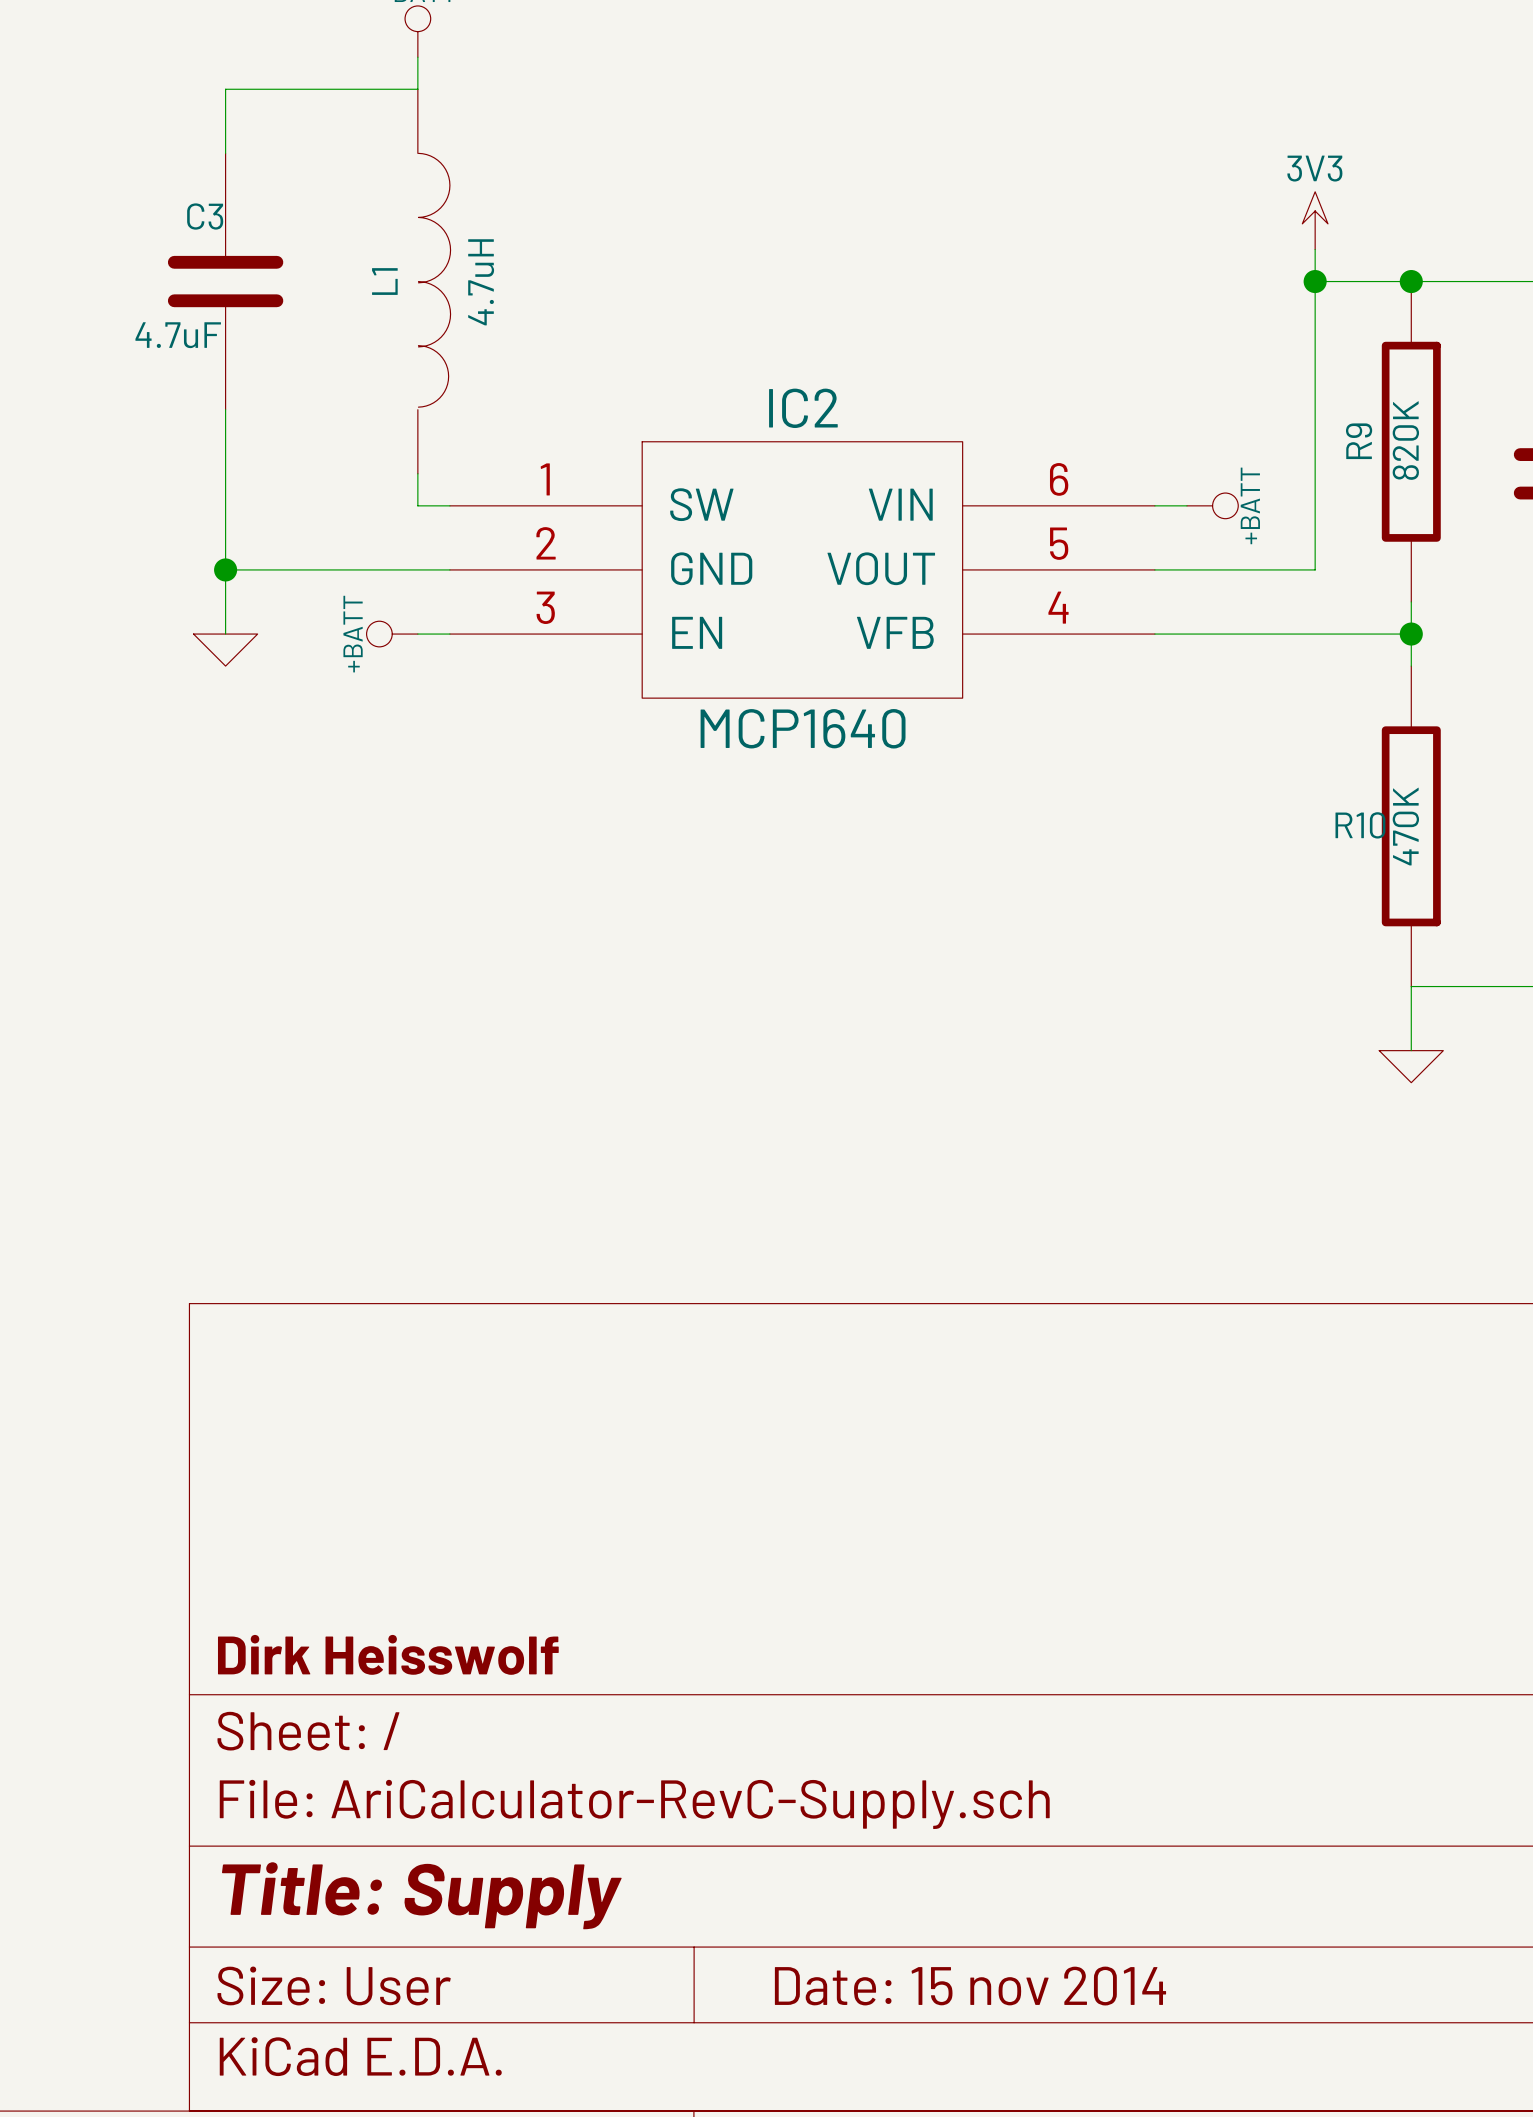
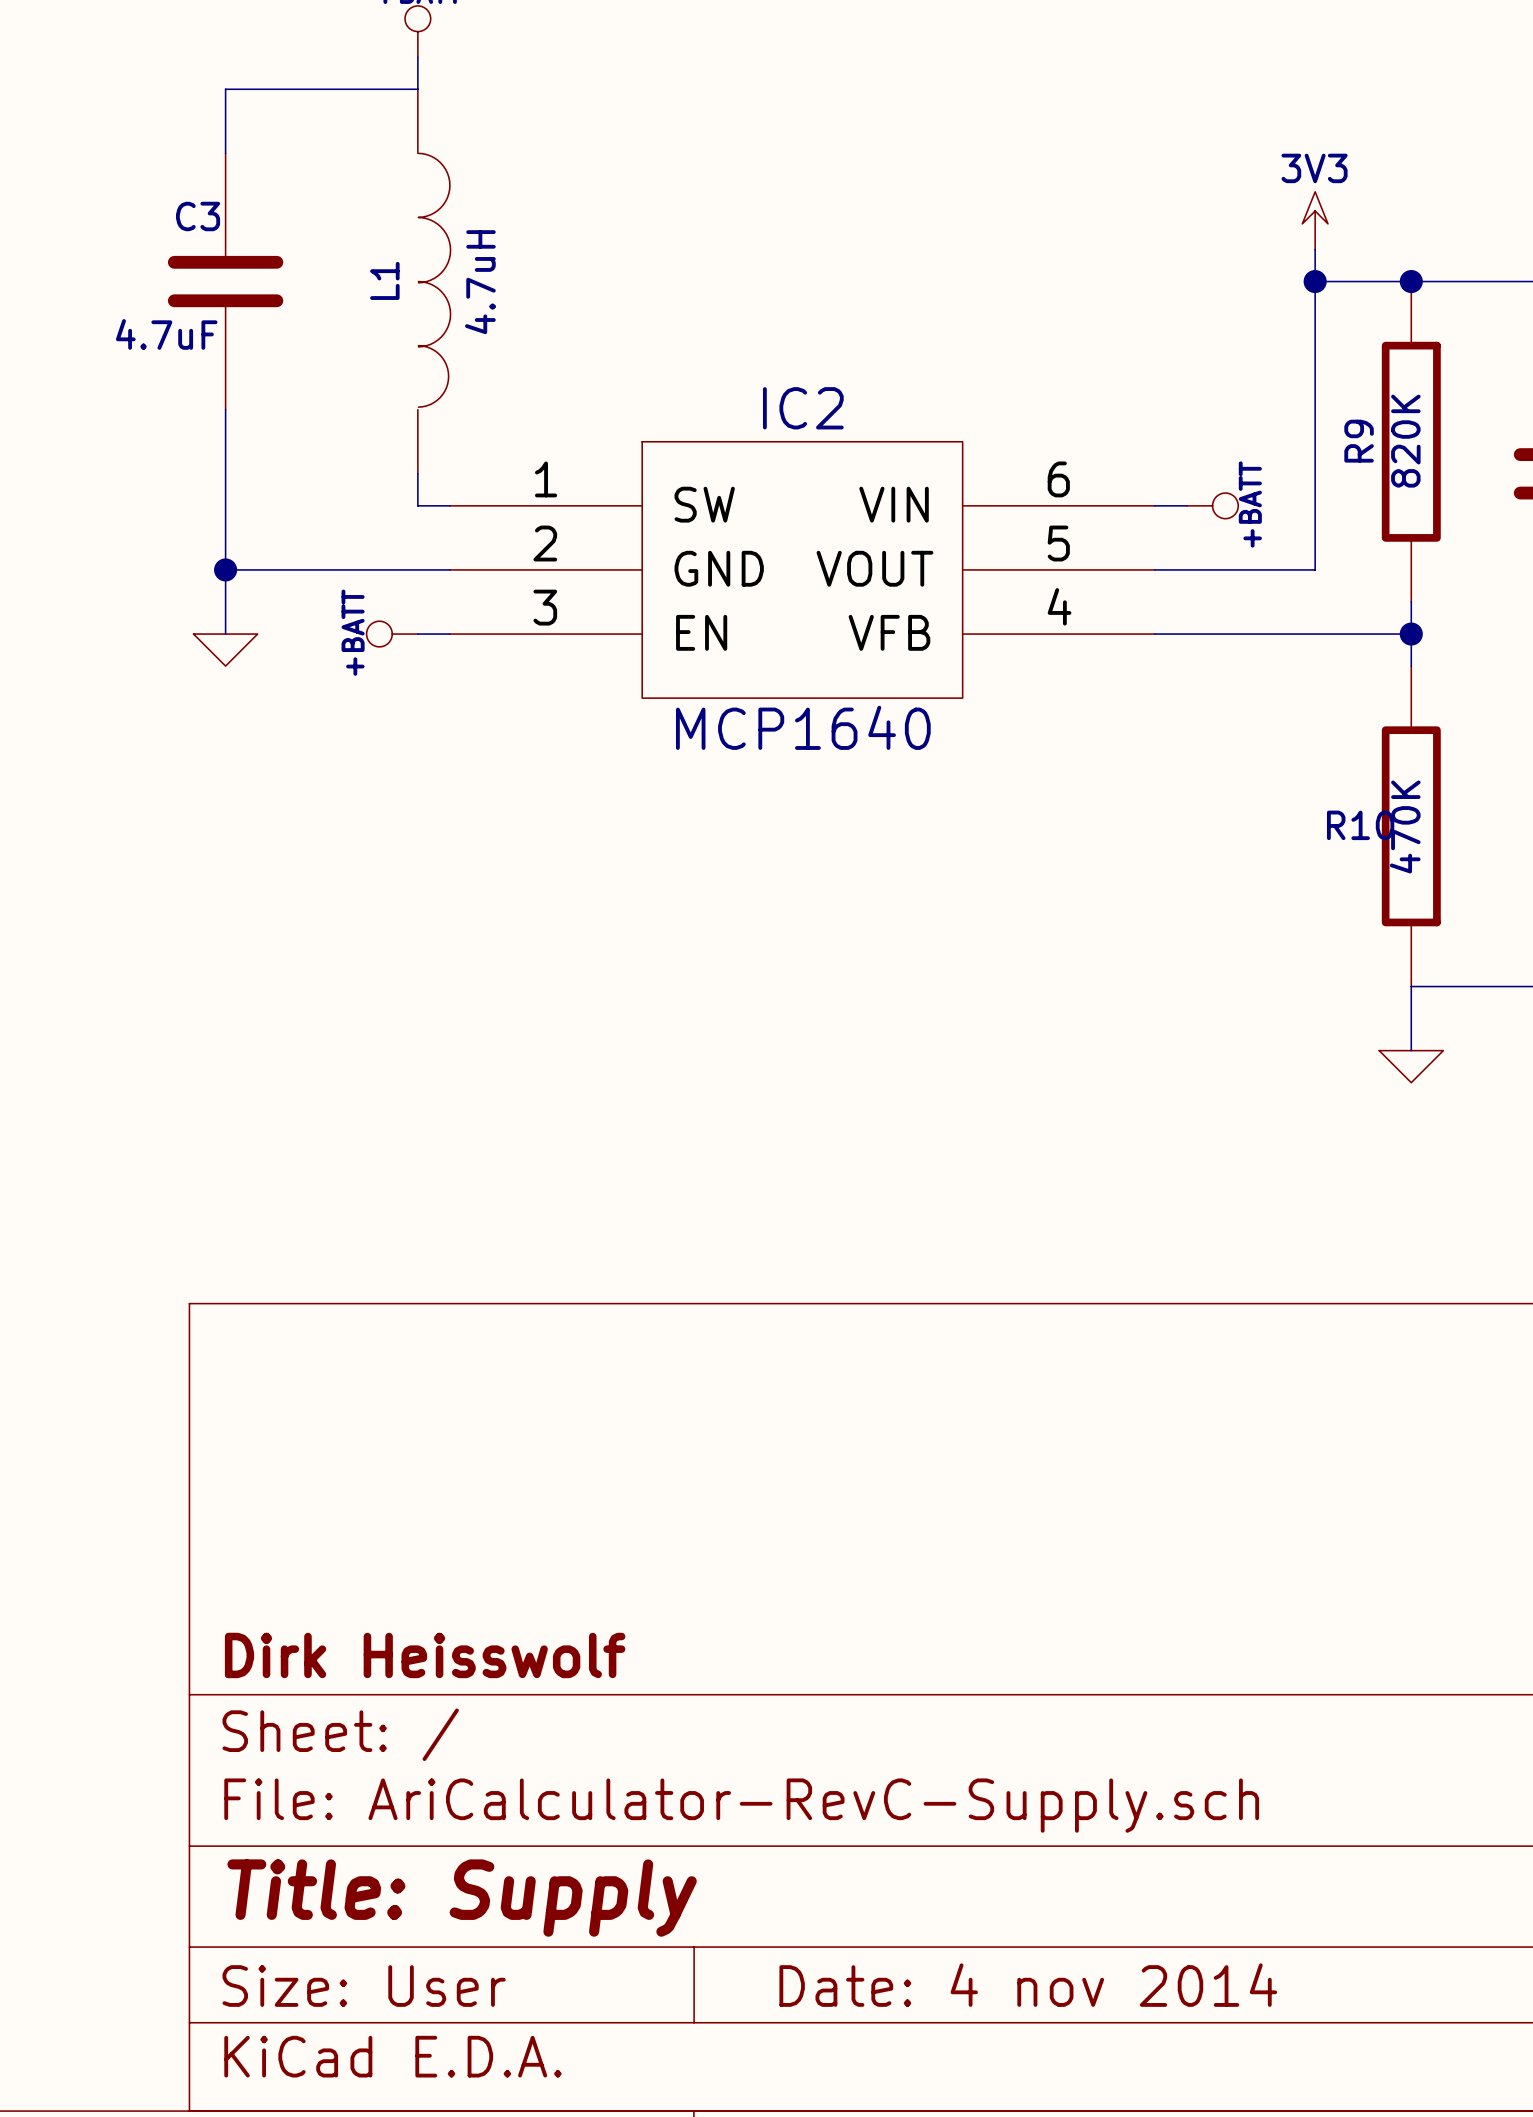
title block: Date: 15 nov 2014 (970, 1986) -> Date: 4 nov 2014 (1028, 1985)

